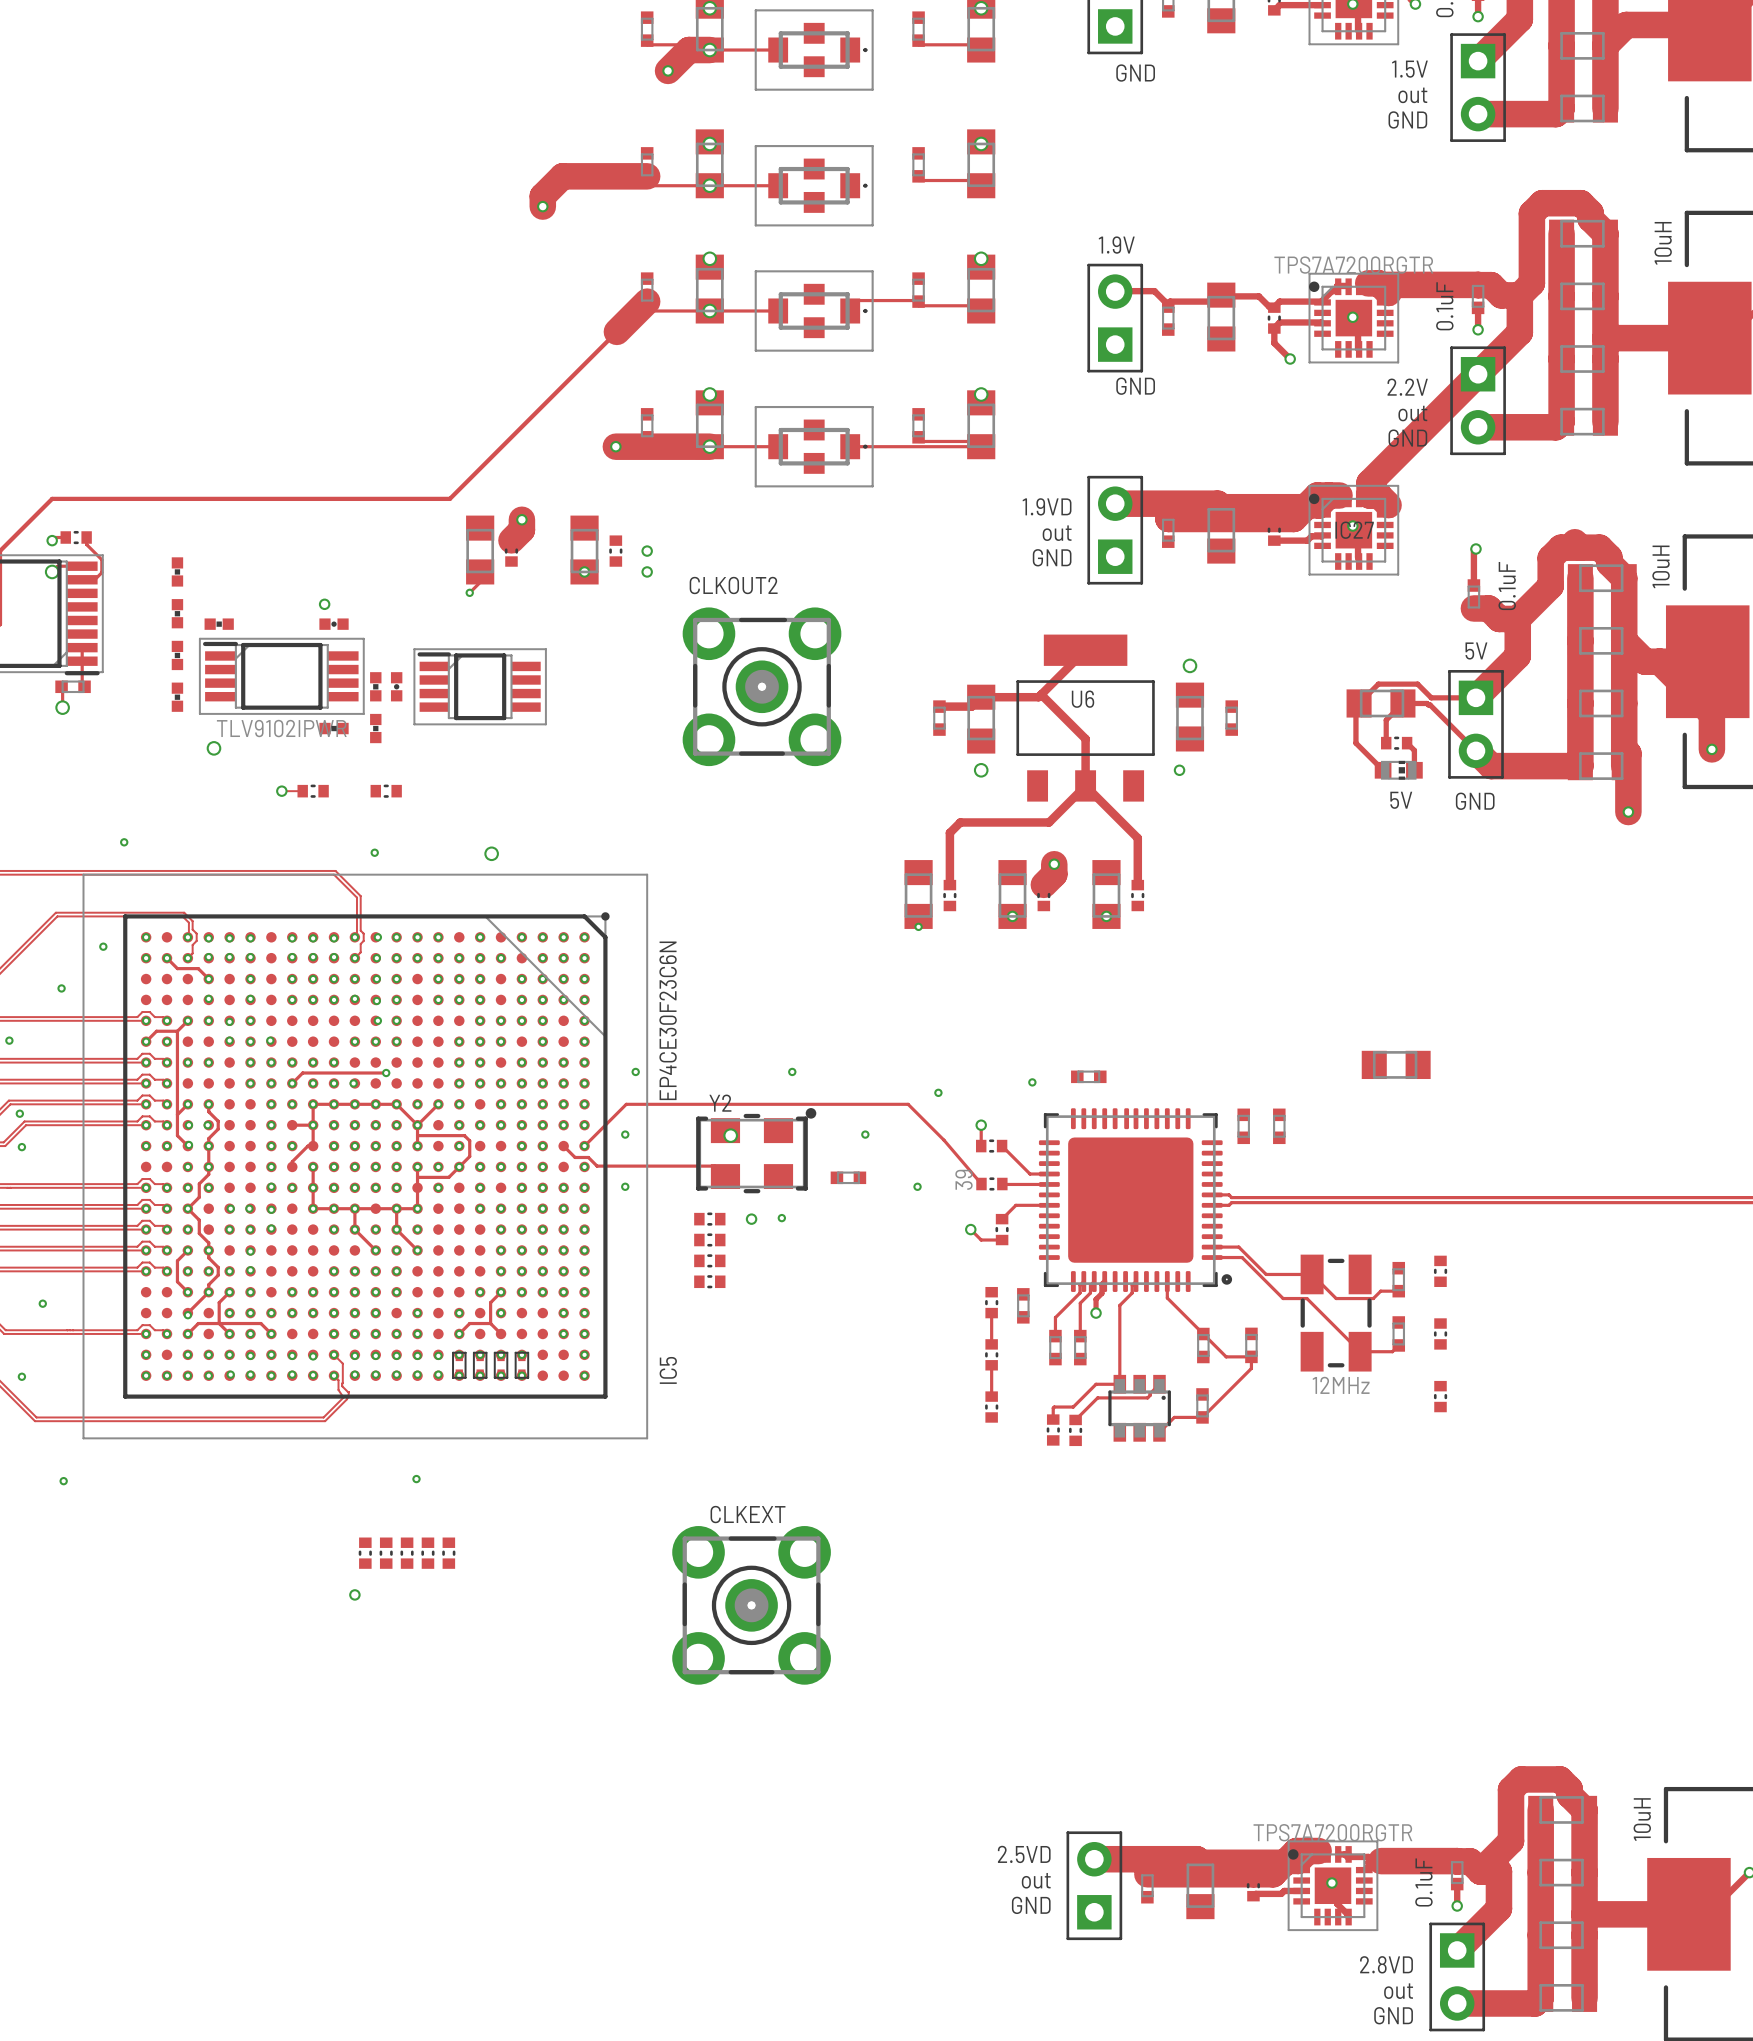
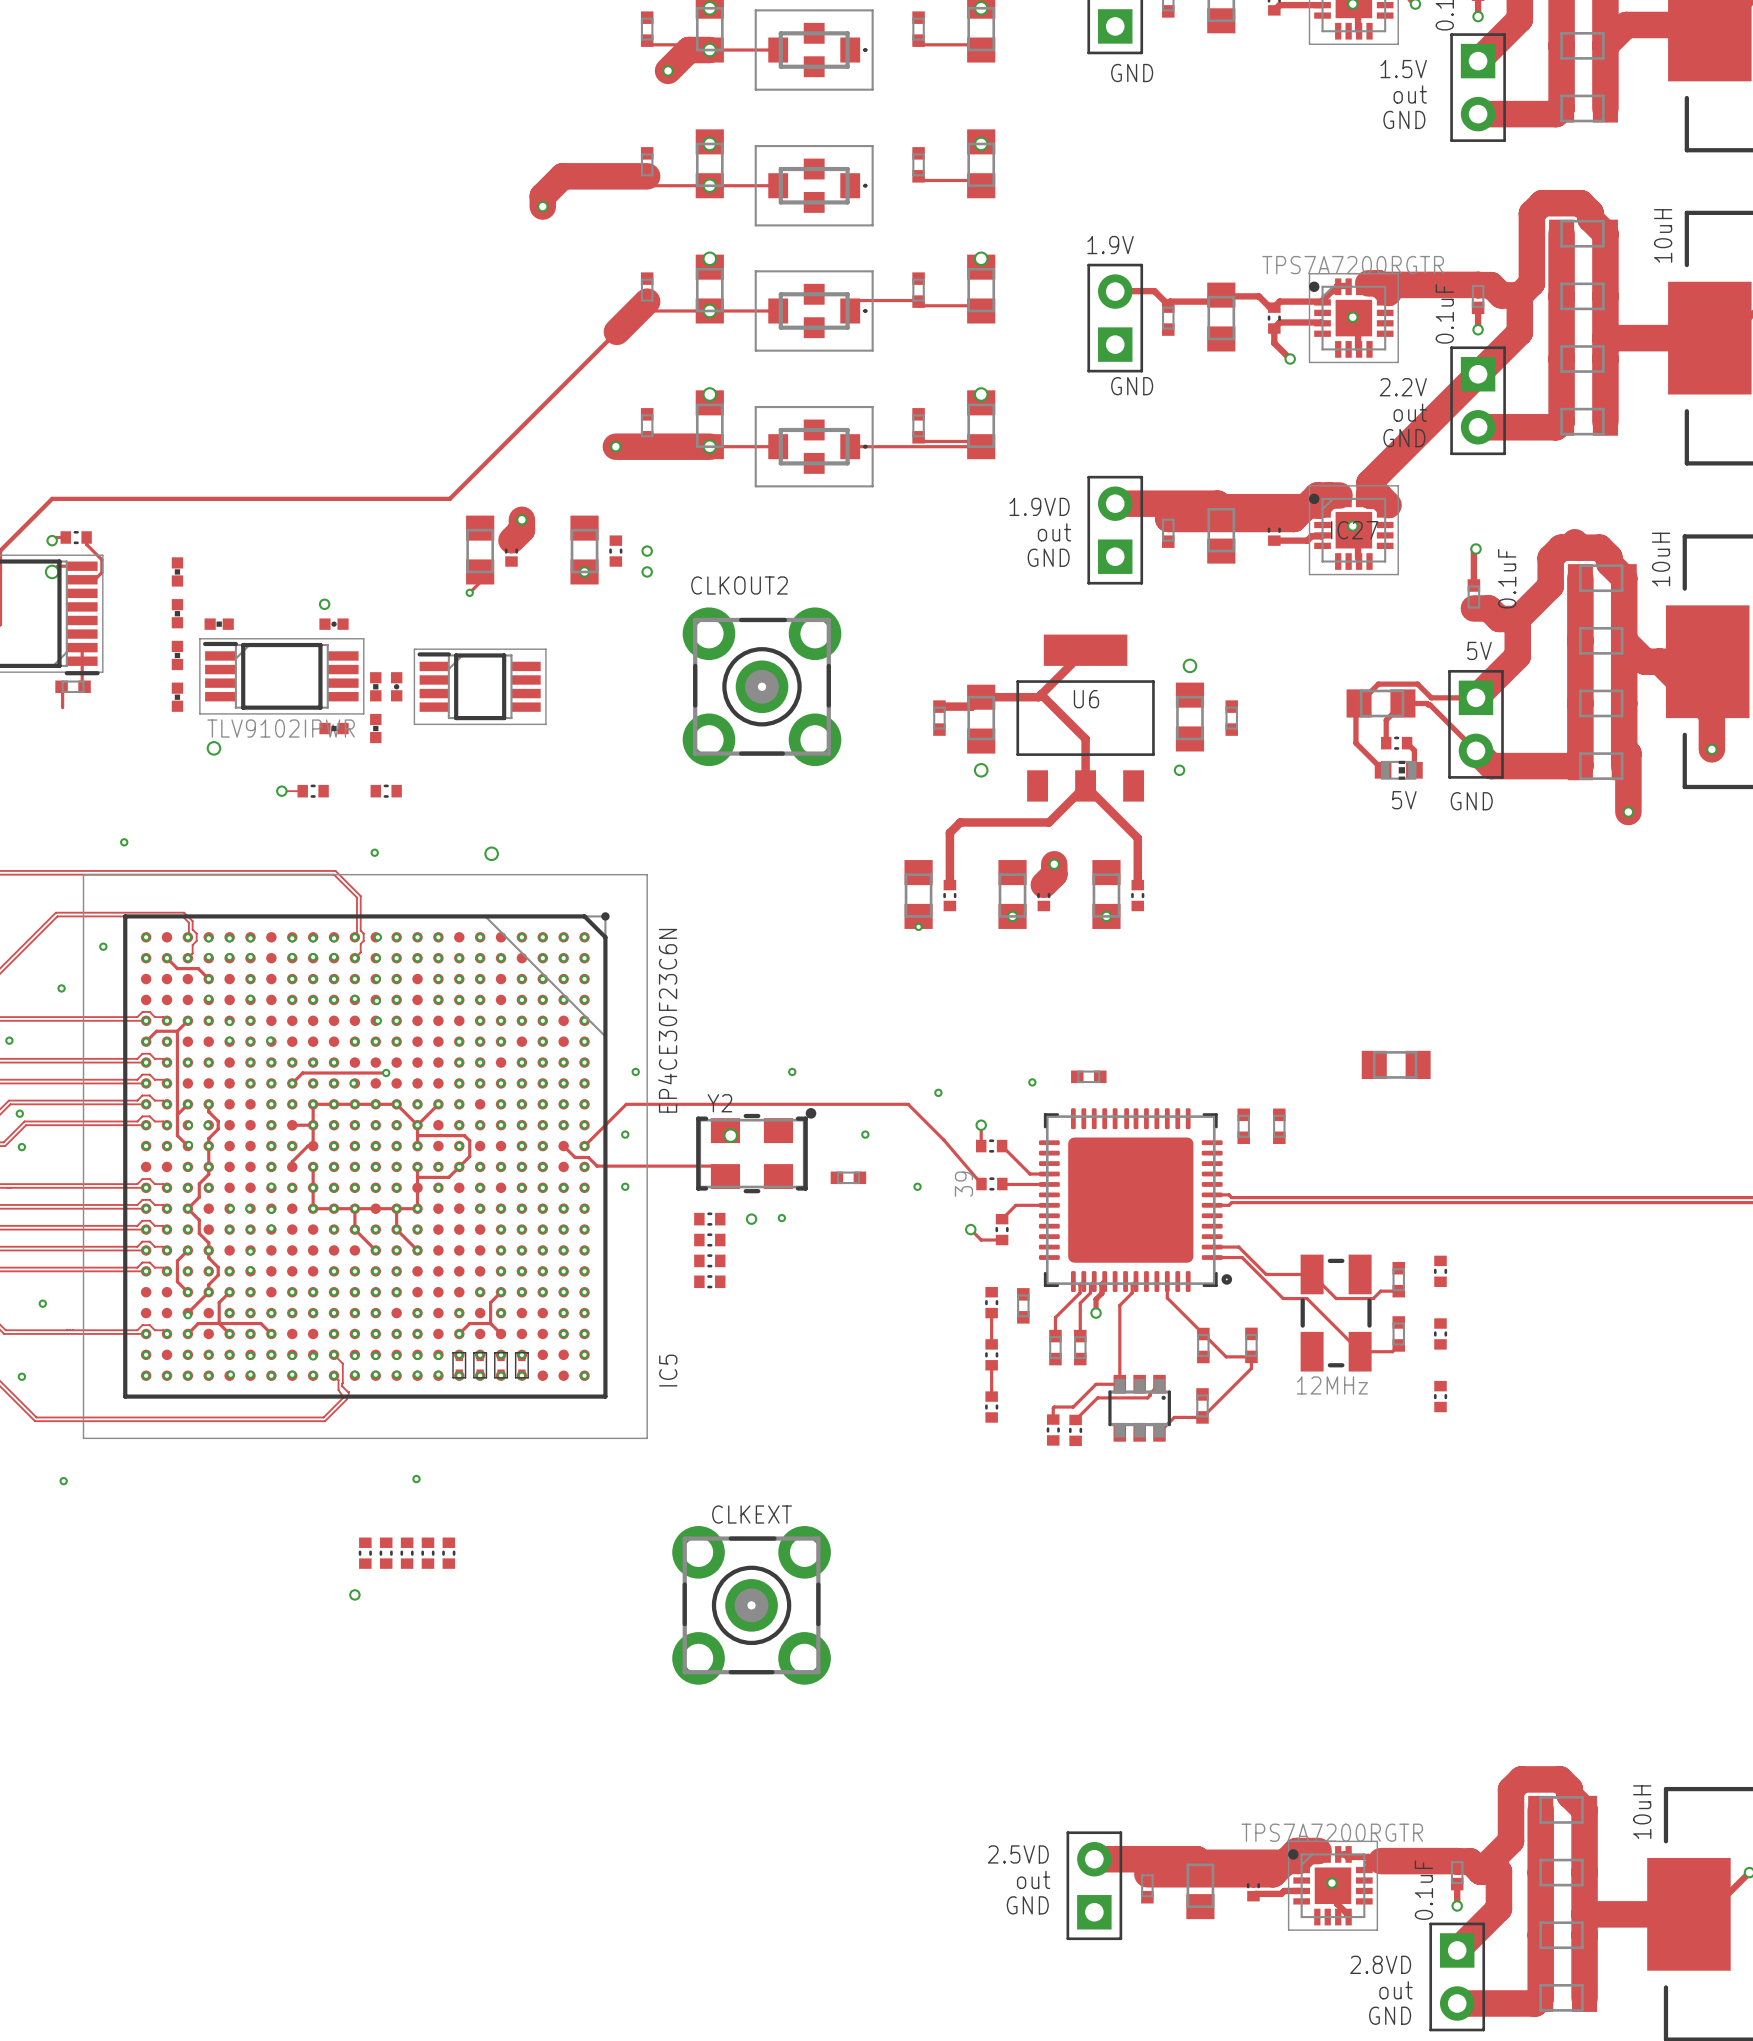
via: (62, 707) -> none

